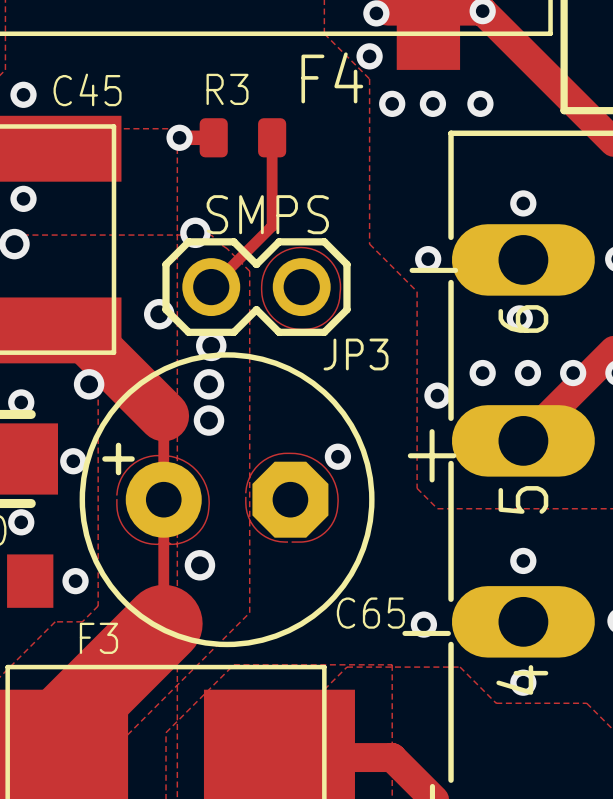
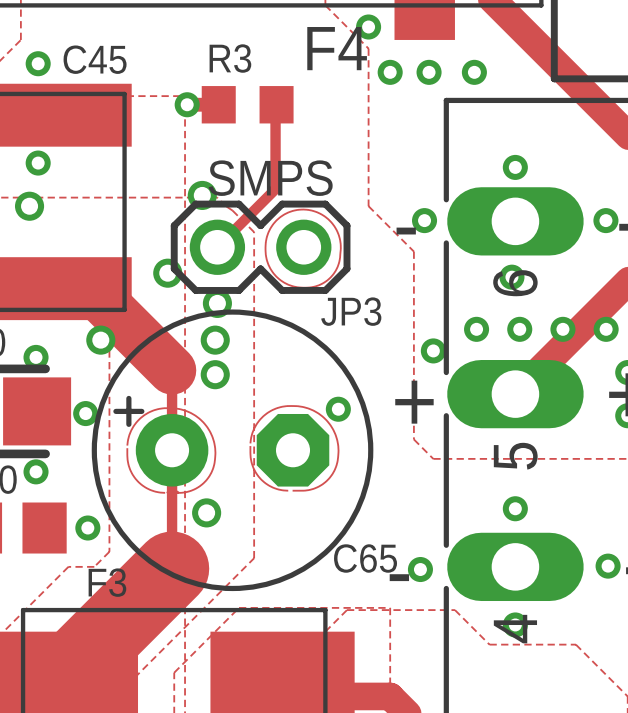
R3 footprint: [199, 118, 287, 158] -> [201, 86, 294, 124]

